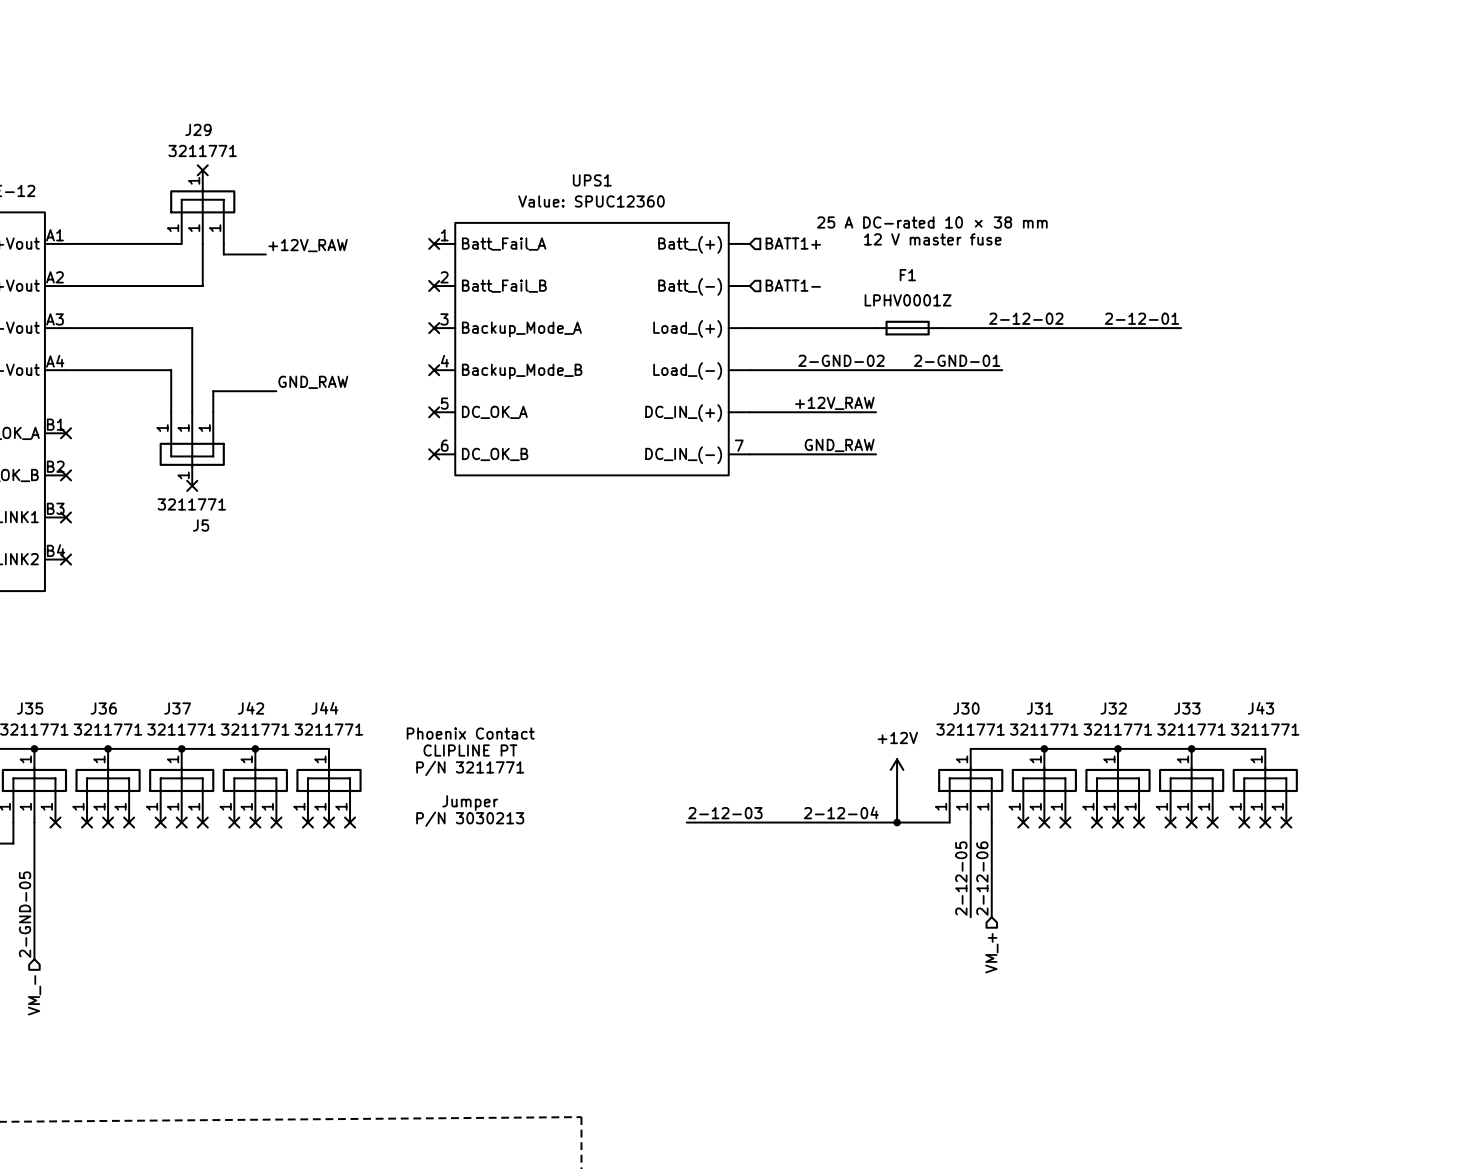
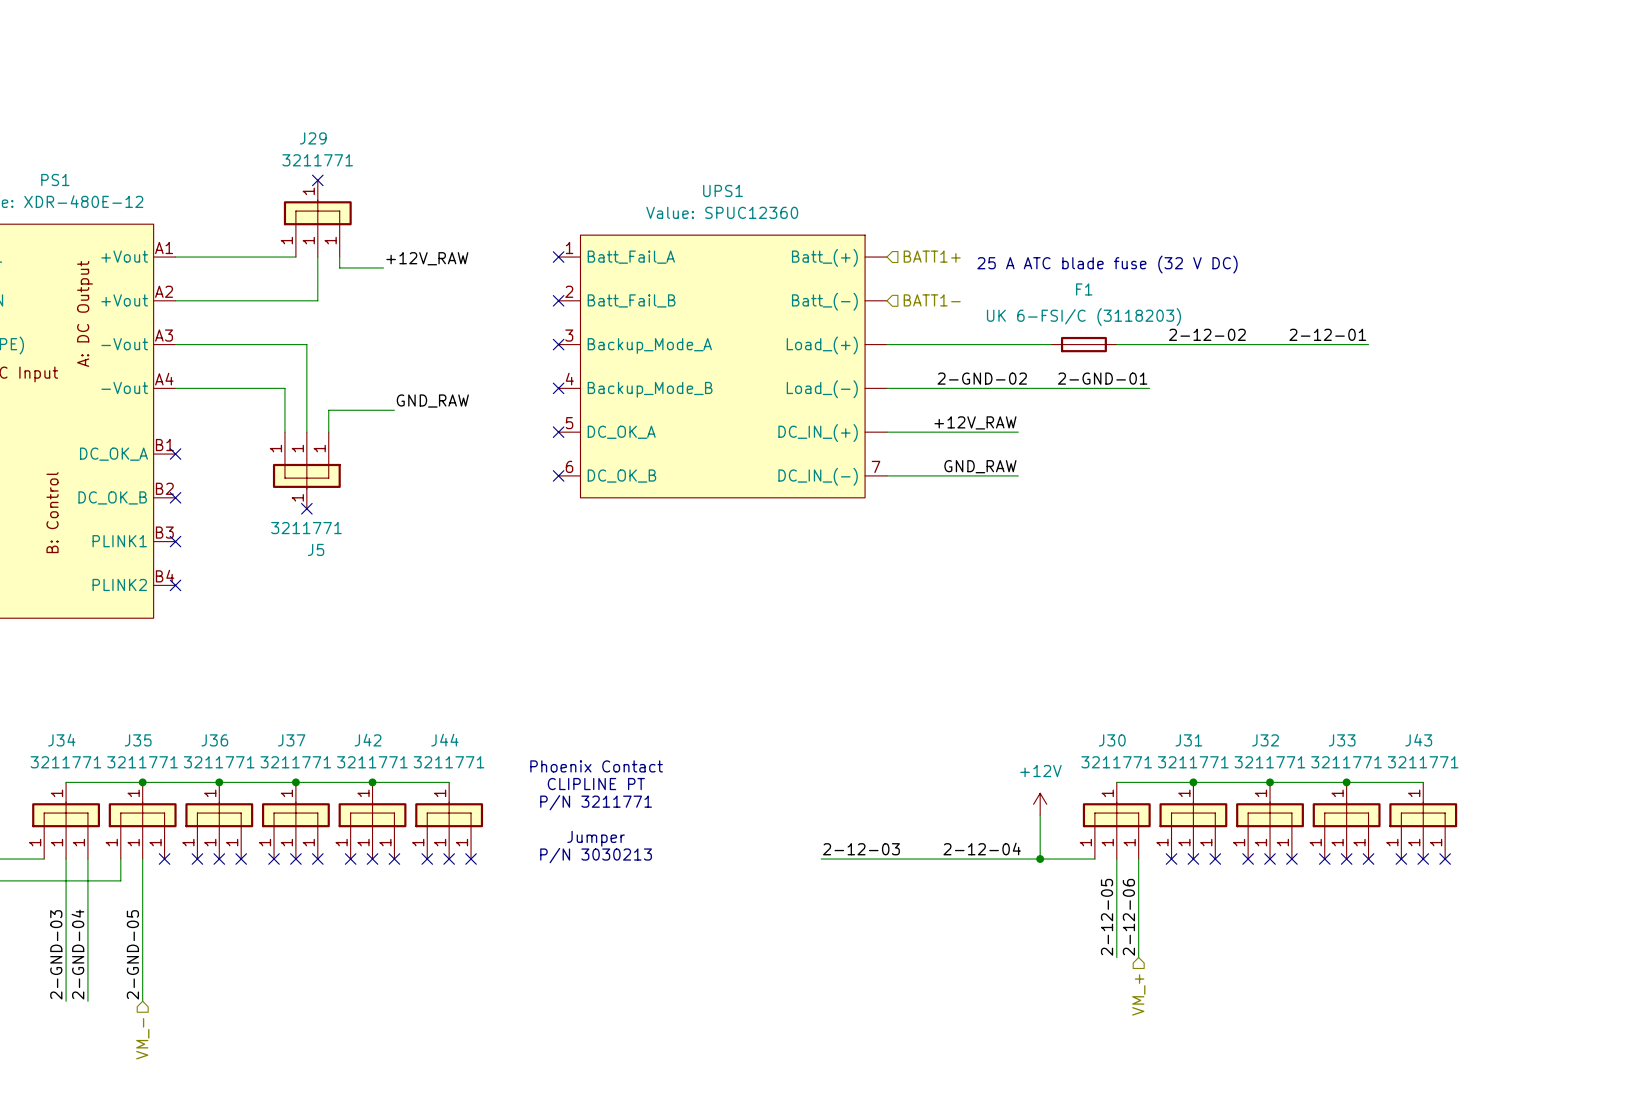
text: 25 A DC-rated 10 × 38 mm (932, 222) -> none
text: 12 V master fuse (932, 239) -> none
text: none -> 25 A ATC blade fuse (32 V DC) (1107, 264)
F1 value: LPHV0001Z (908, 300) -> UK 6-FSI/C (3118203) (1083, 317)
label position: 2-12-02 (1026, 318) -> 2-12-02 (1207, 334)
label position: 2-12-01 (1141, 318) -> 2-12-01 (1327, 334)
F1 position: (907, 328) -> (1083, 344)
wire: none -> (1335, 344) (1368, 344)

